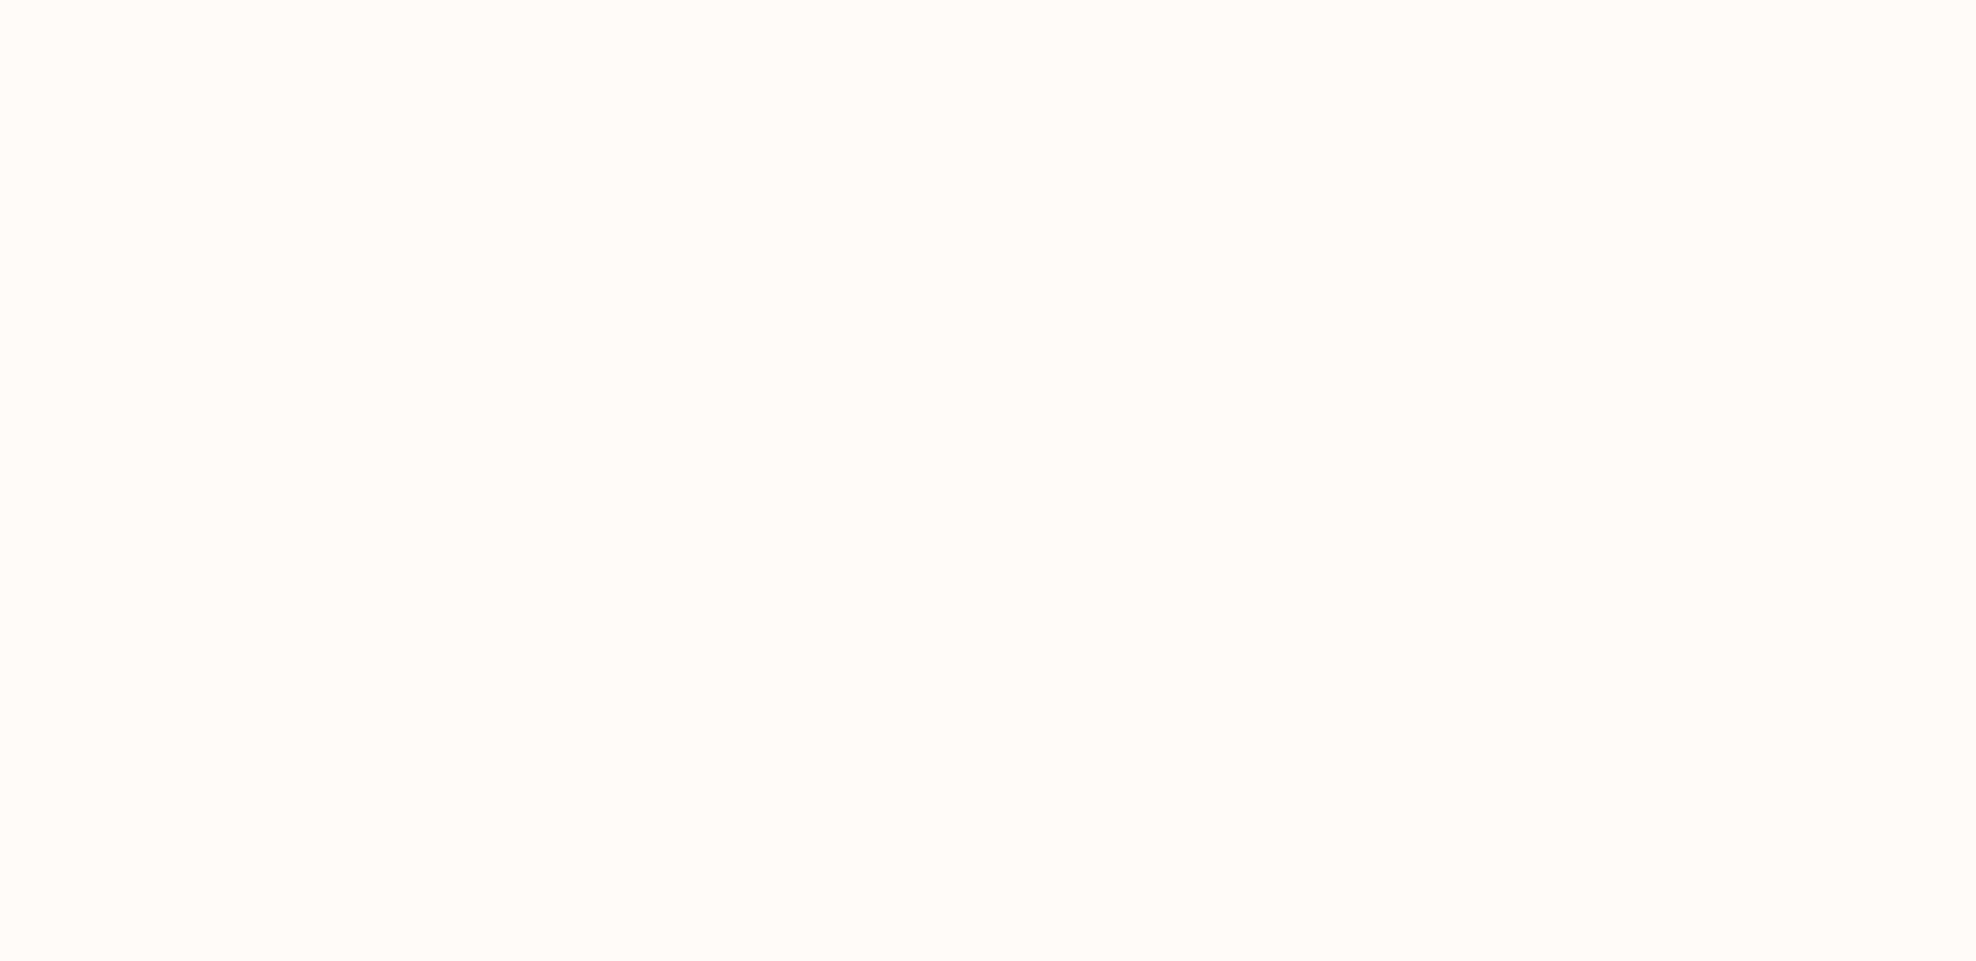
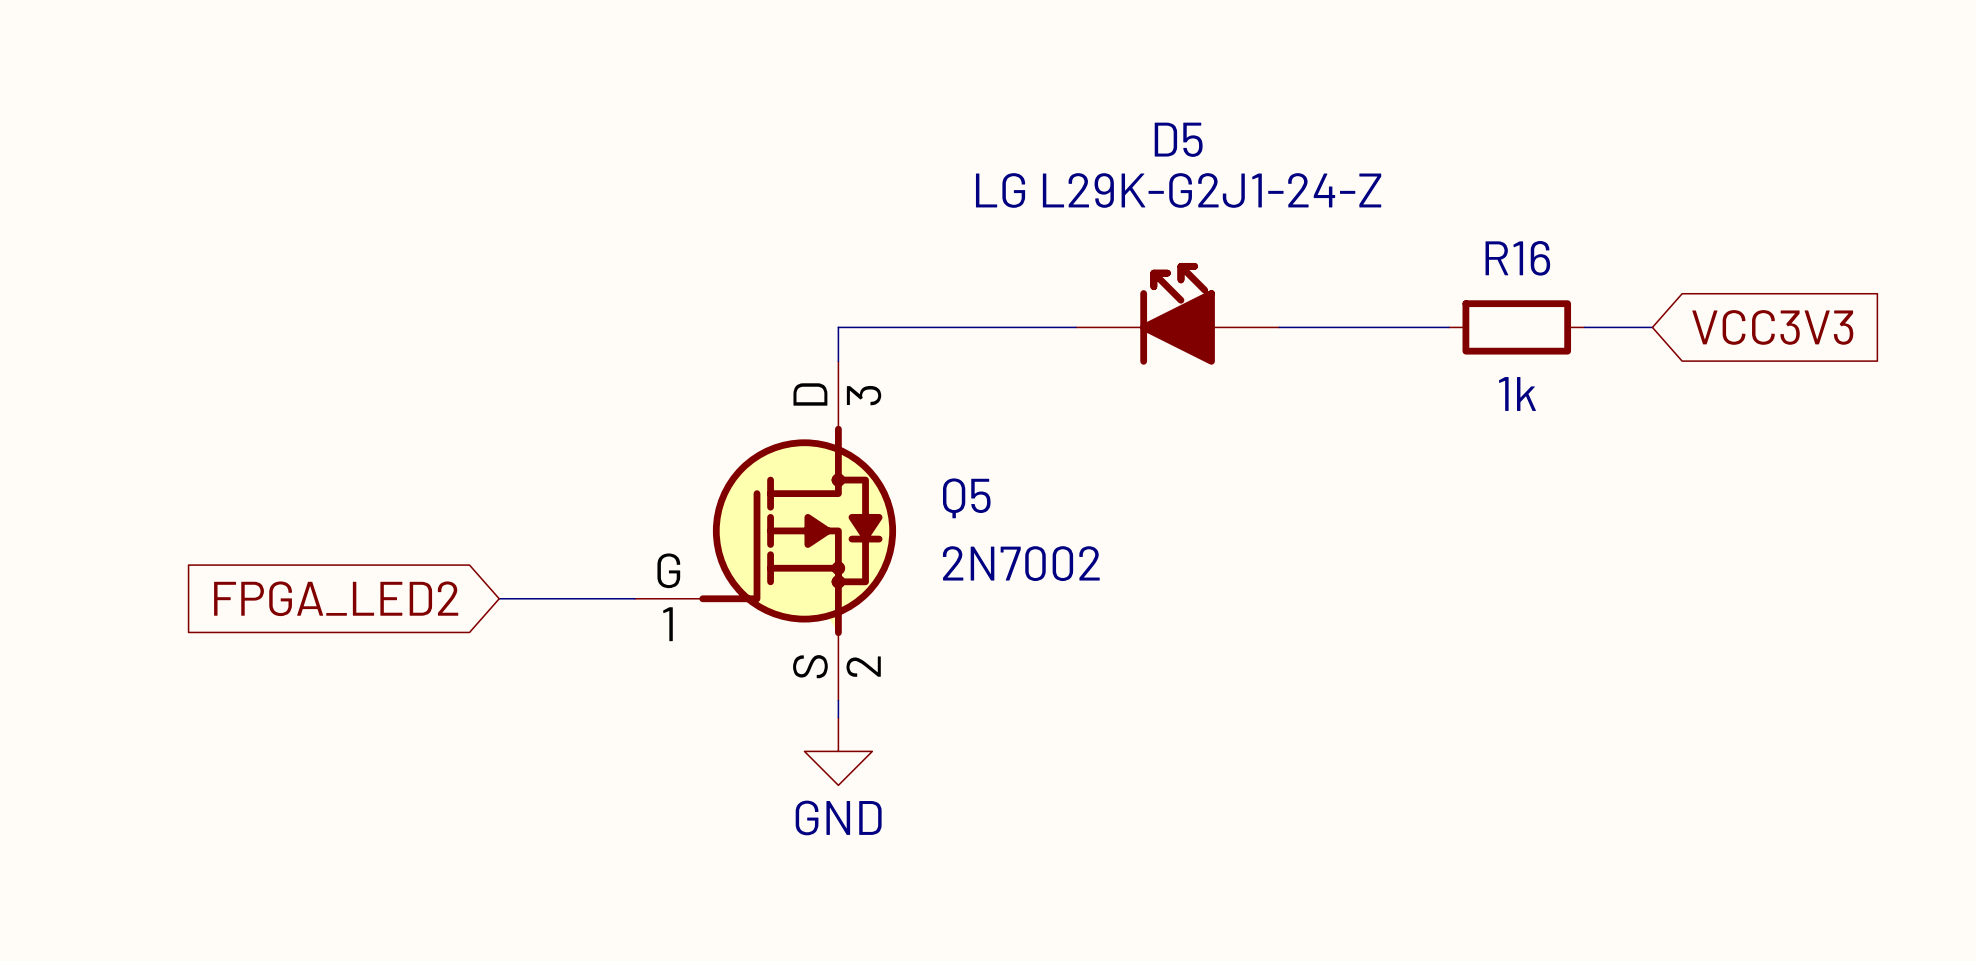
D5: none -> (1177, 313)
wire: none -> (1075, 327) (838, 327) (838, 361)
wire: none -> (1279, 327) (1448, 327)
R16: none -> (1516, 327)
wire: none -> (1584, 327) (1652, 327)
global label: none -> VCC3V3 (1772, 327)
Q5: none -> (765, 530)
global label: none -> FPGA_LED2 (336, 598)
wire: none -> (499, 598) (634, 598)
wire: none -> (838, 700) (838, 717)
power symbol: none -> GND (838, 751)

